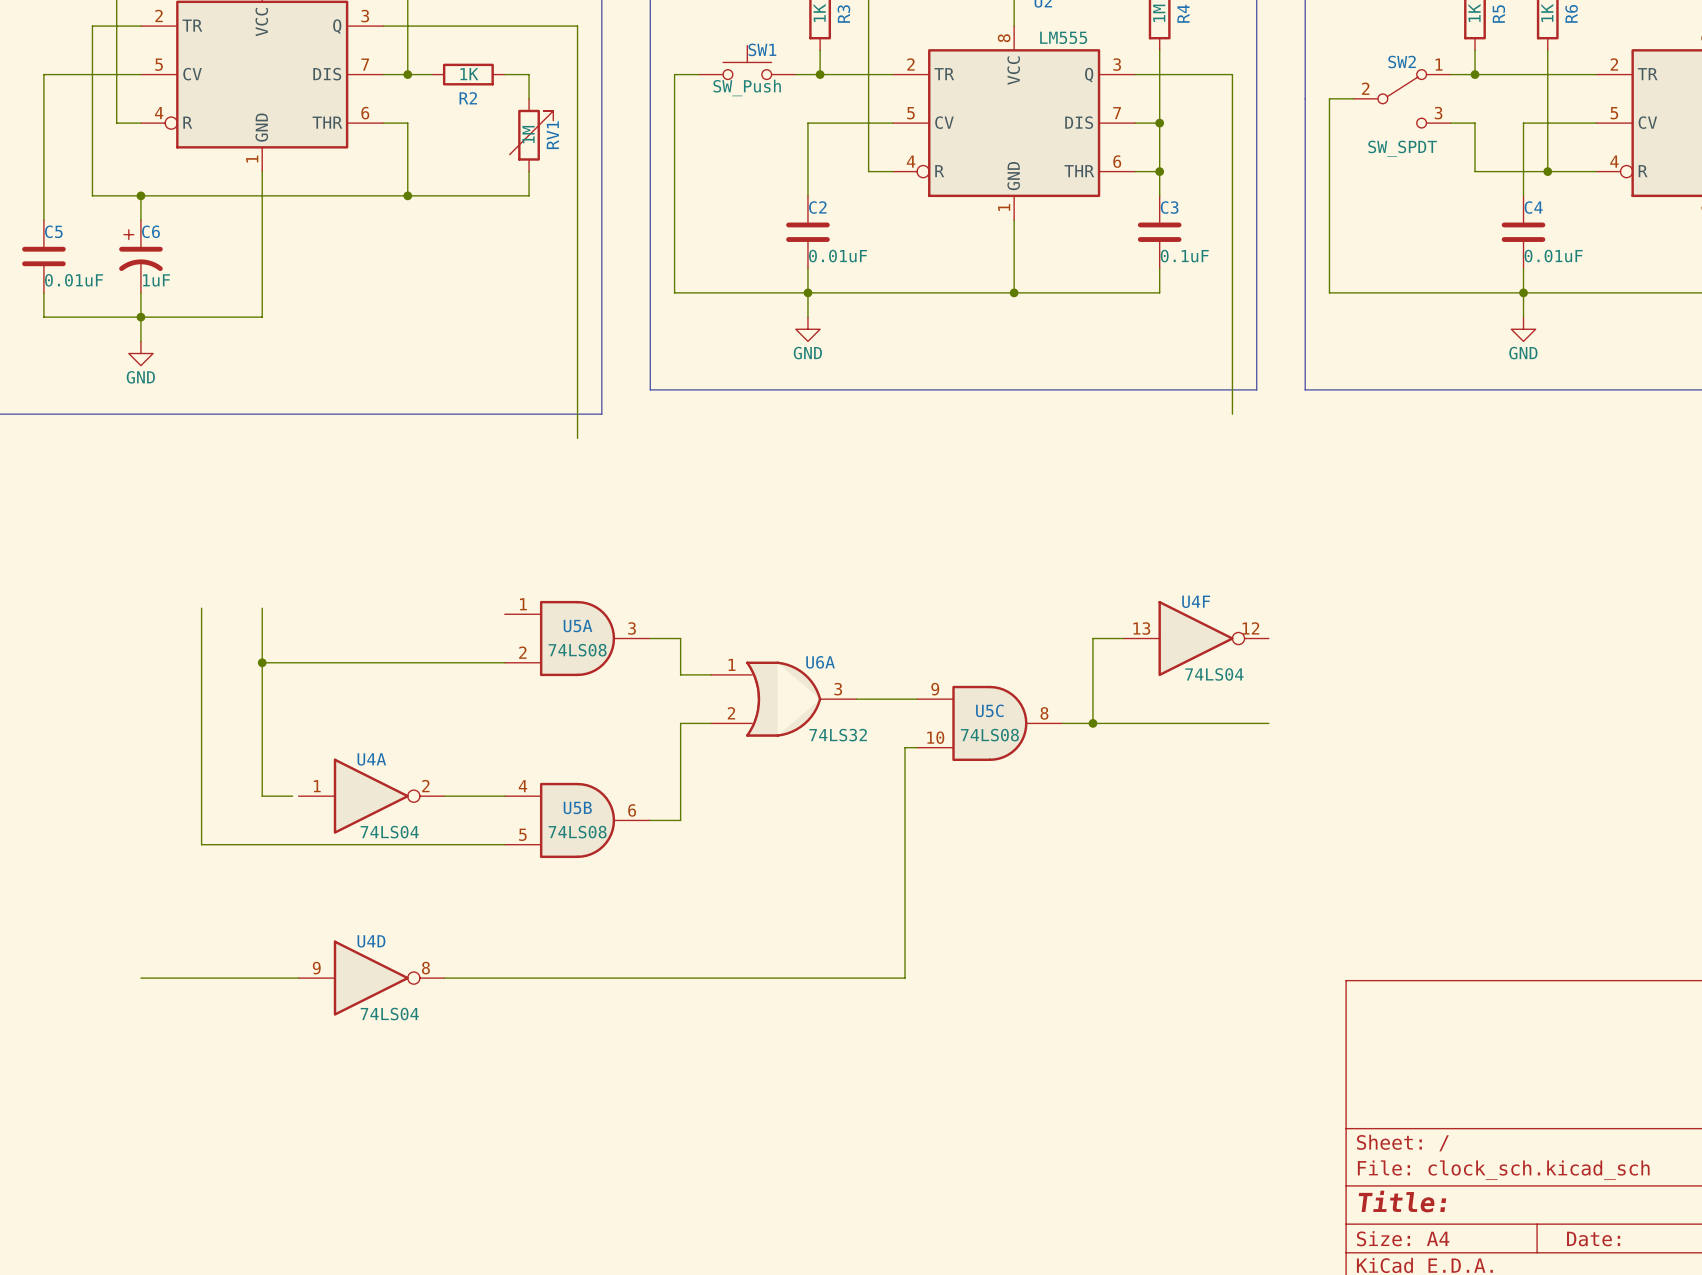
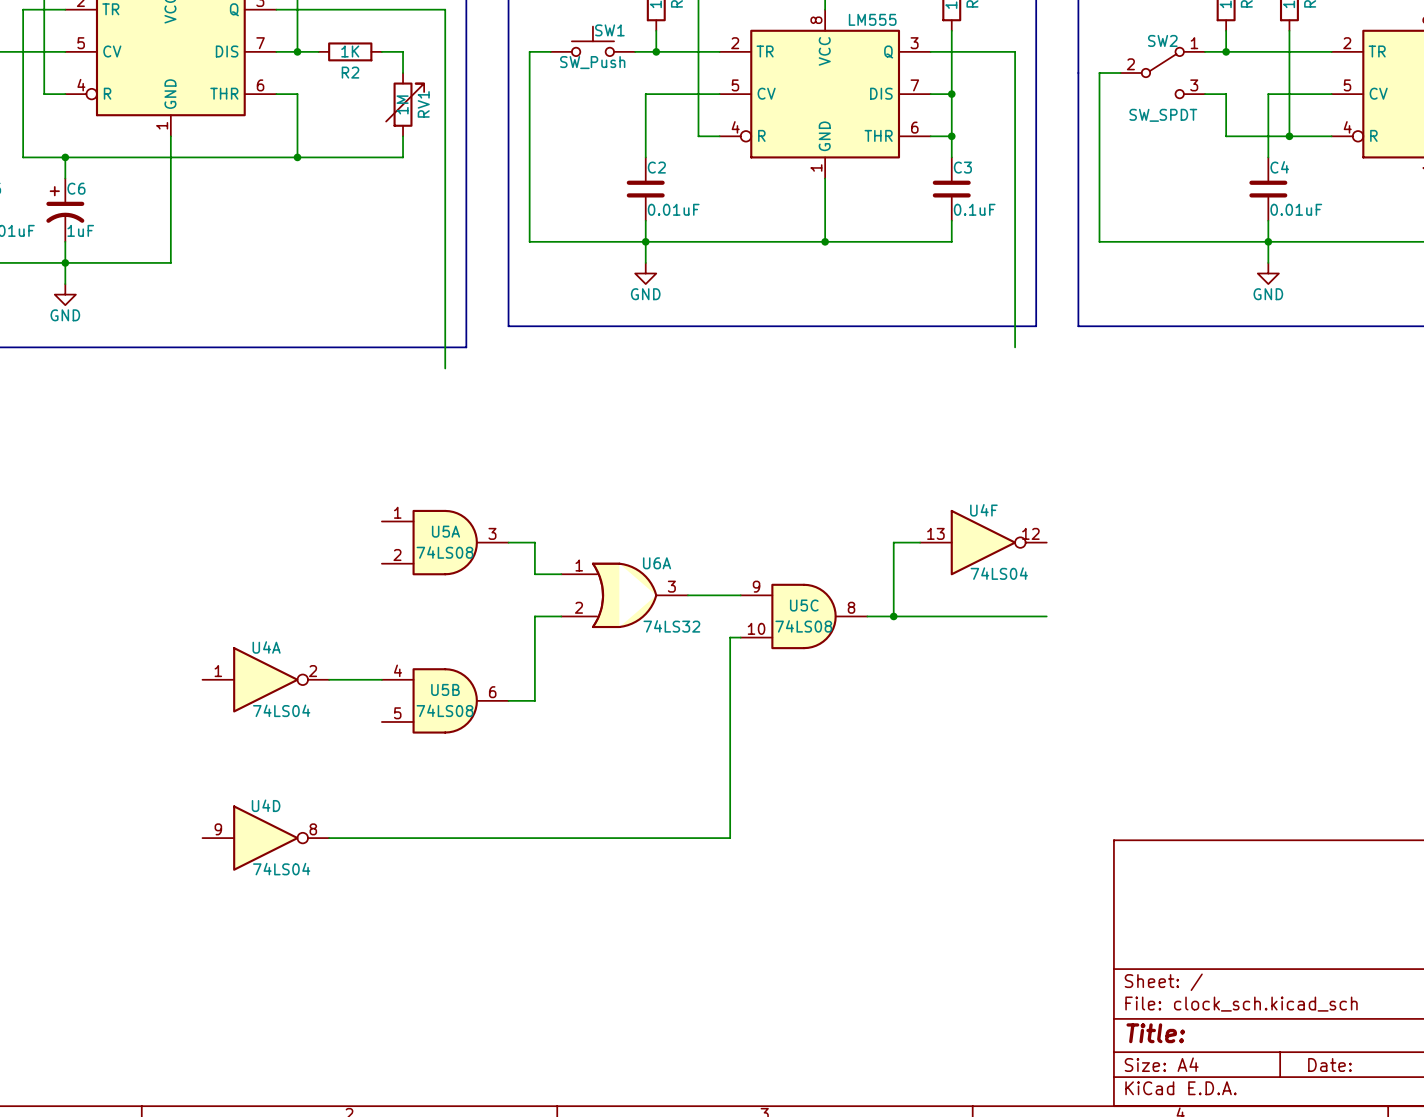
wire: (201, 608) (201, 844) (504, 844) -> none
wire: (262, 608) (262, 796) (292, 796) -> none
wire: (262, 662) (504, 662) -> none
junction: (262, 662) -> none
wire: (140, 978) (298, 978) -> none

